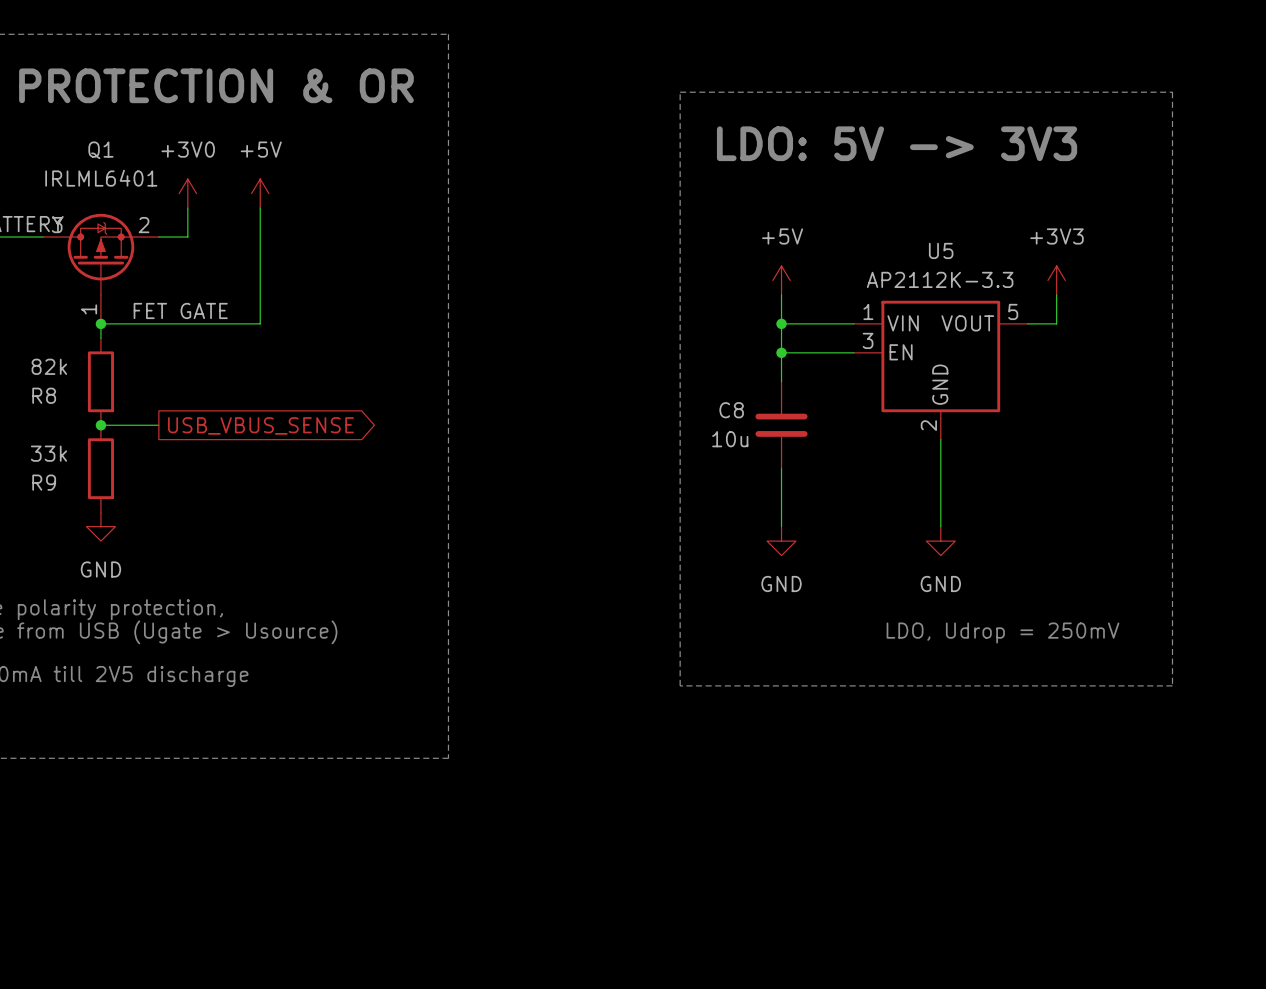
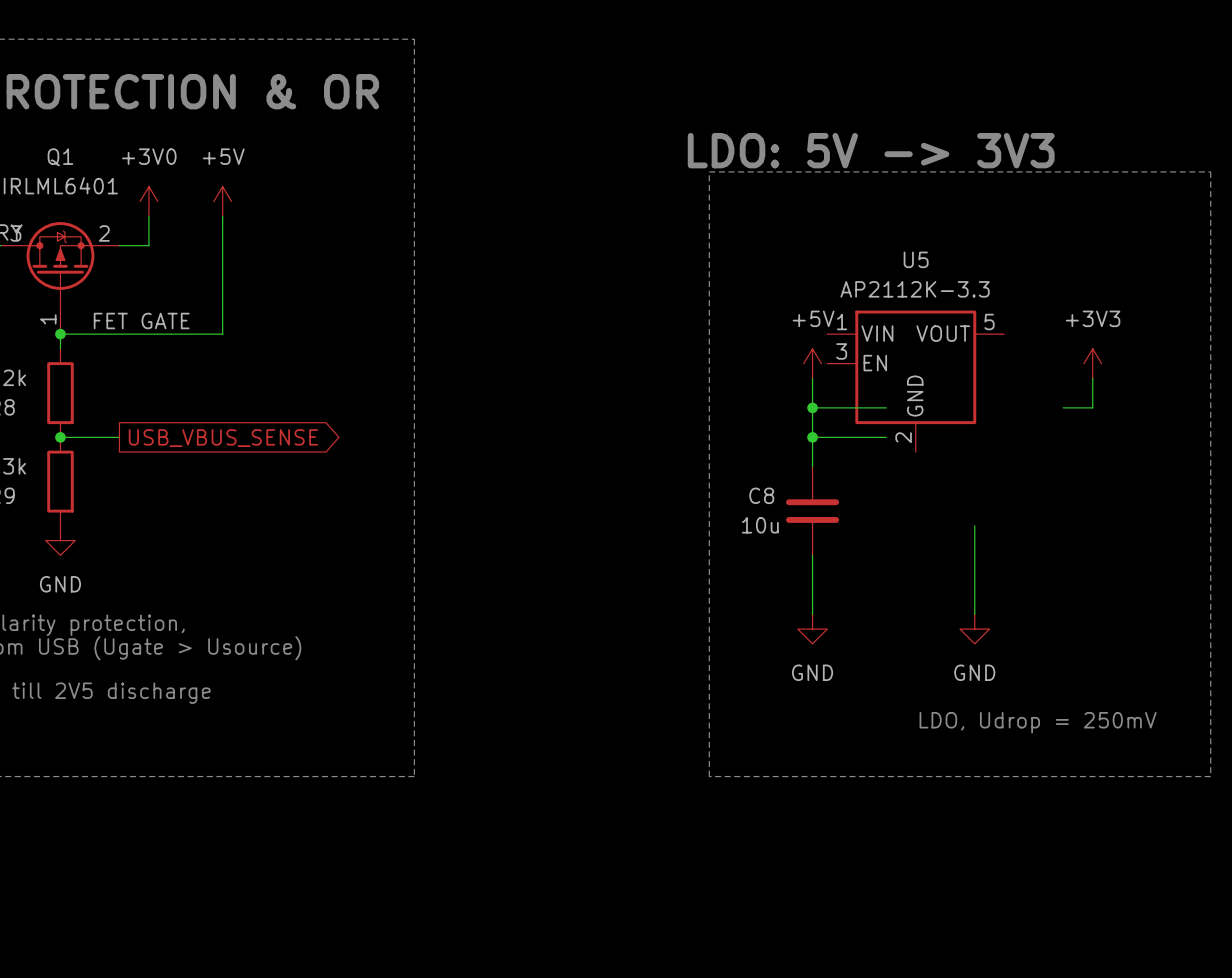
line: (680, 92) (1172, 92) (1172, 685) (680, 685) (680, 92) -> (709, 171) (1210, 171) (1210, 776) (709, 776) (709, 171)
power symbol position: +5V (781, 280) -> +5V (812, 363)
power symbol position: +3V3 (1056, 280) -> +3V3 (1092, 363)
wire: (781, 294) (781, 381) -> (812, 378) (812, 466)
wire: (1056, 294) (1056, 323) (1027, 323) -> (1092, 378) (1092, 407) (1063, 407)
wire: (781, 323) (853, 323) -> (812, 407) (886, 407)
junction: (781, 323) -> none
wire: (781, 352) (853, 352) -> (812, 437) (886, 437)
junction: (781, 352) -> none
junction: none -> (812, 407)
C8 position: (781, 425) -> (812, 511)
junction: none -> (812, 437)
wire: (940, 439) (940, 526) -> (974, 525) (974, 614)
wire: (781, 468) (781, 526) -> (812, 555) (812, 614)
power symbol: GND (781, 541) -> none
power symbol: GND (940, 541) -> none
power symbol: none -> GND (812, 629)
power symbol: none -> GND (974, 629)
text position: LDO, Udrop = 250mV (1002, 633) -> LDO, Udrop = 250mV (1038, 722)

